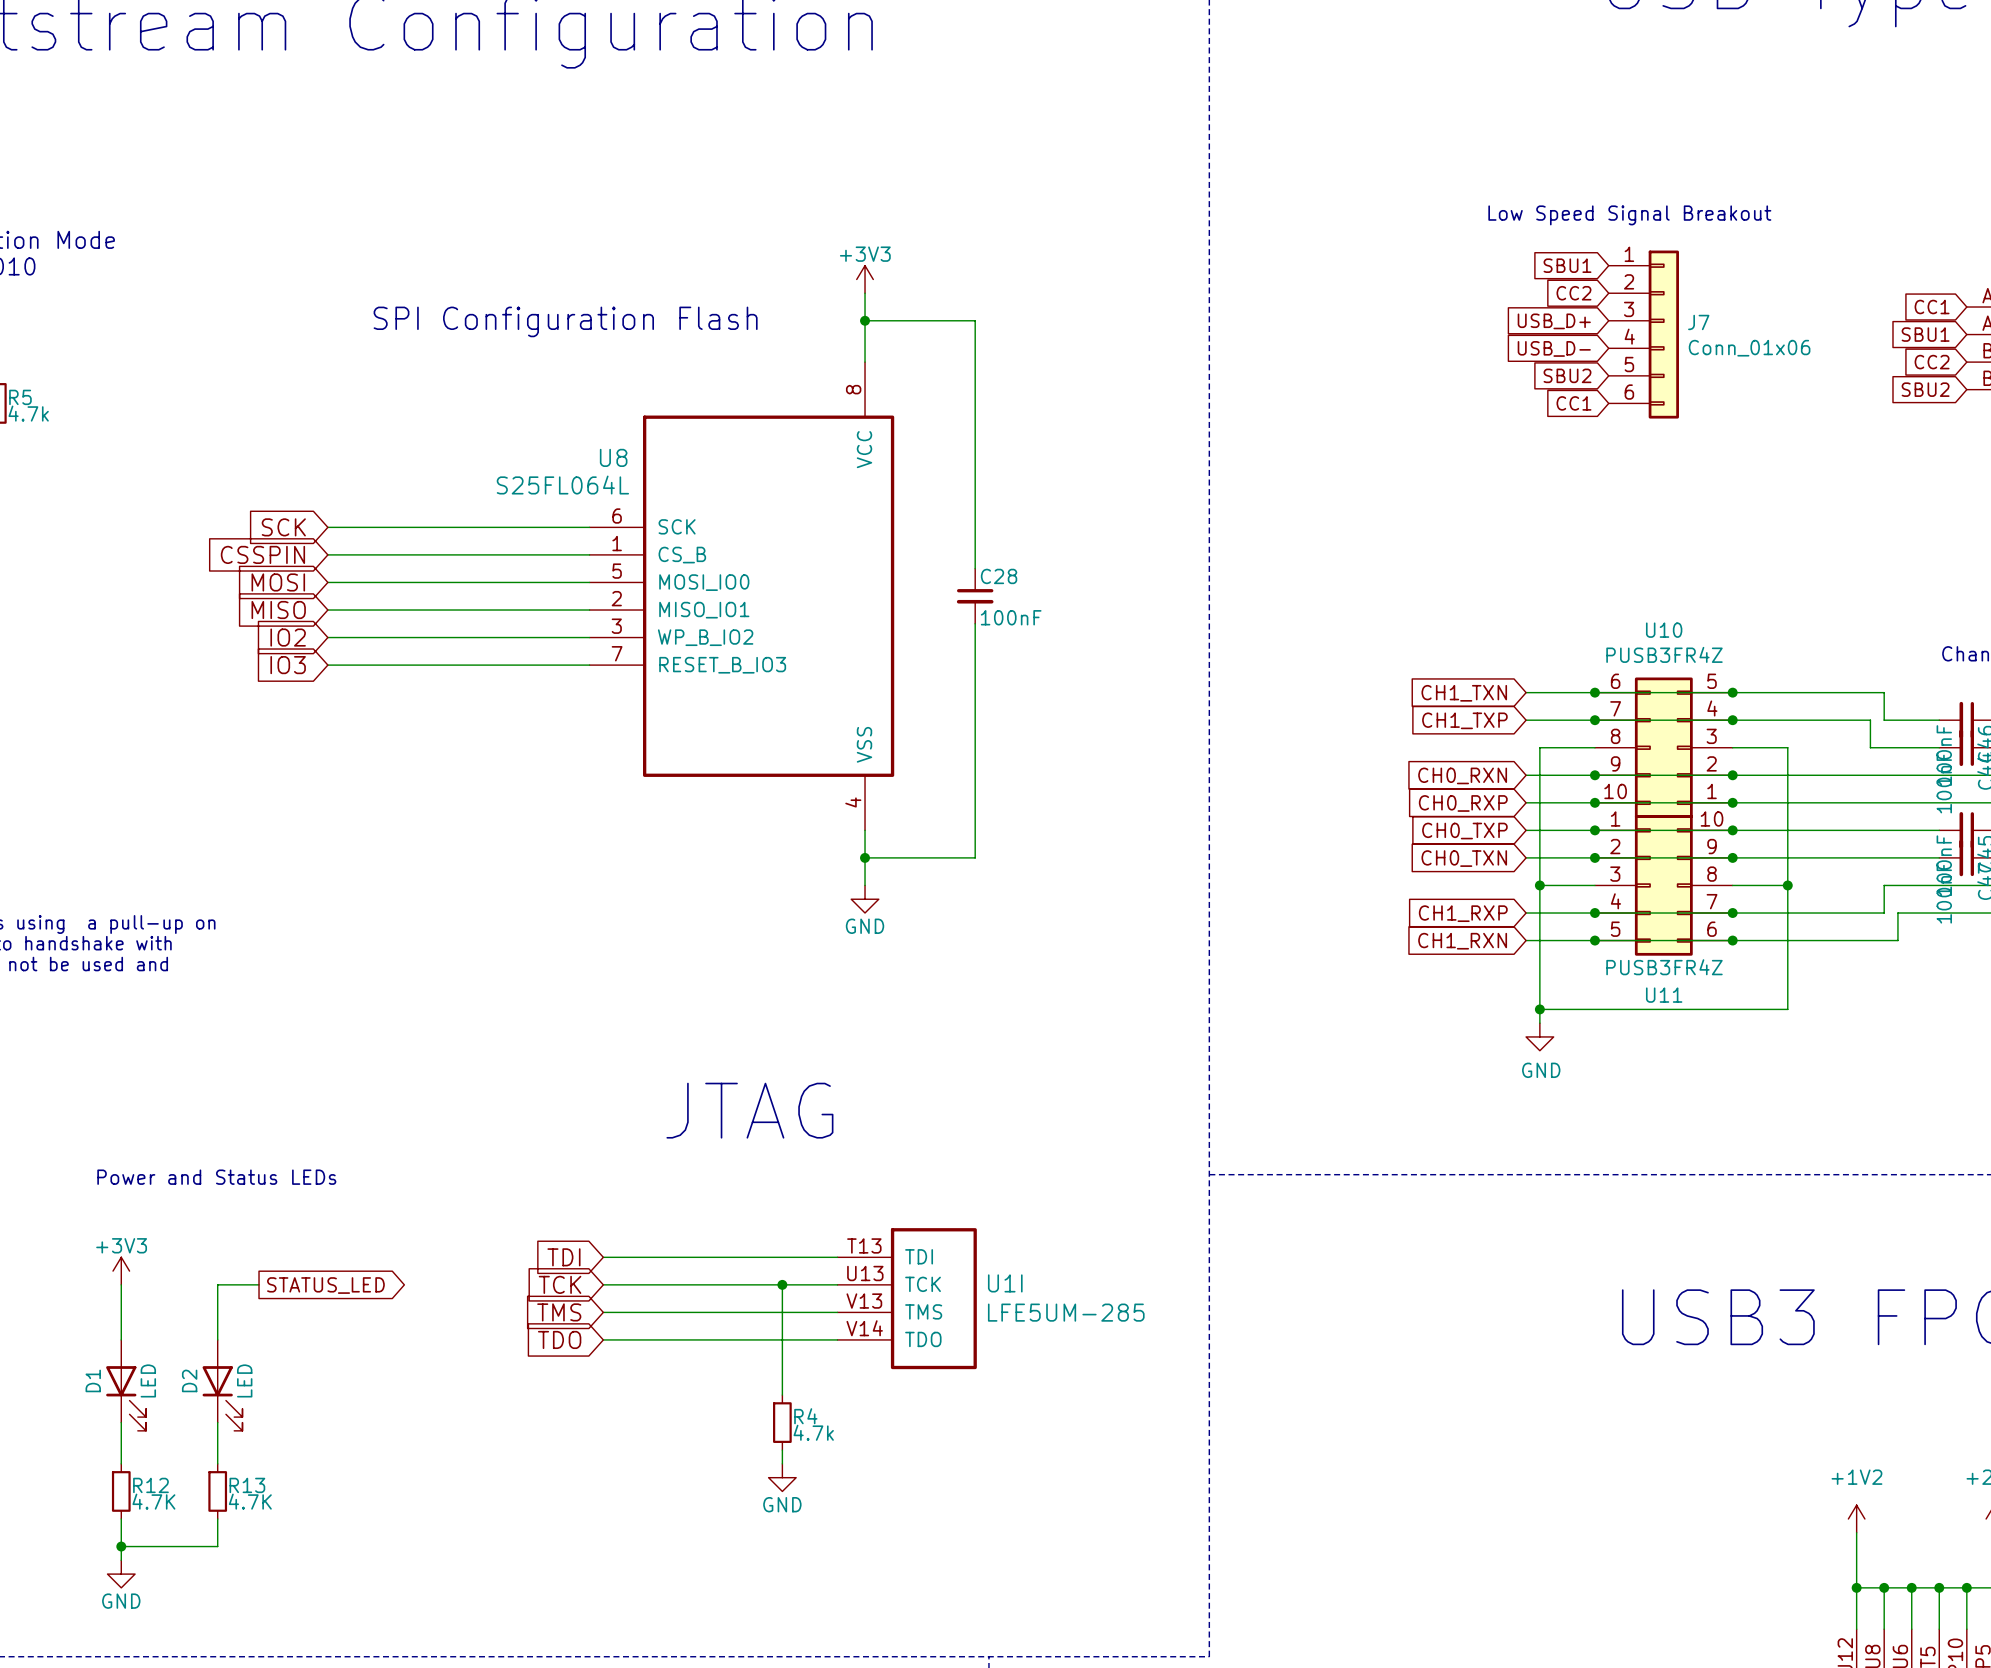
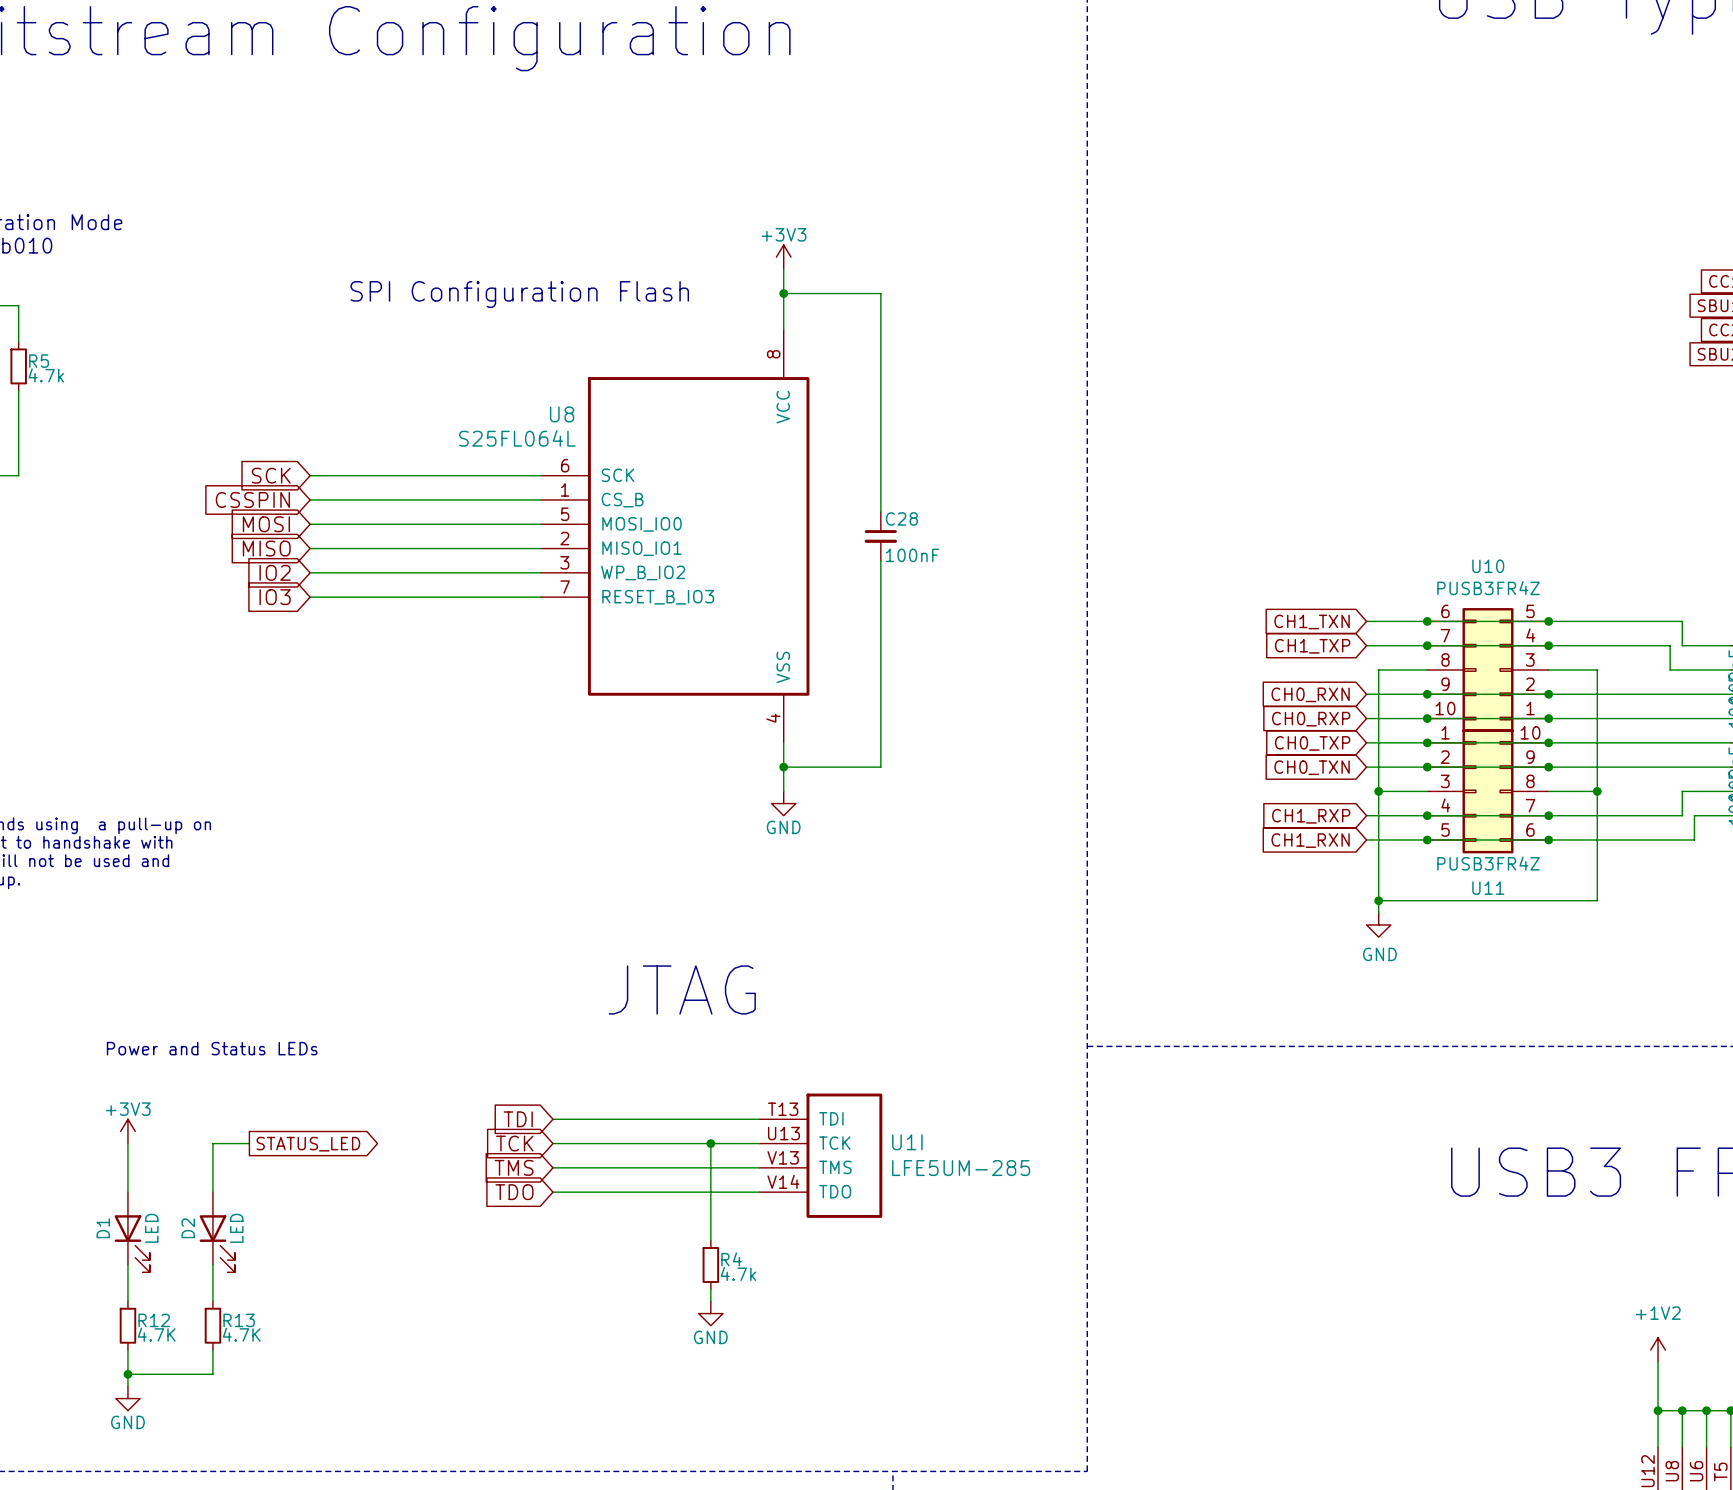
text: Low Speed Signal Breakout (1629, 215) -> none
global label: SBU1 (1567, 265) -> none
global label: CC2 (1573, 293) -> none
global label: USB_D+ (1554, 321) -> none
J7: Conn_01x06 (1643, 334) -> none
global label: USB_D- (1554, 348) -> none
global label: SBU2 (1567, 375) -> none
global label: CC1 (1573, 403) -> none

